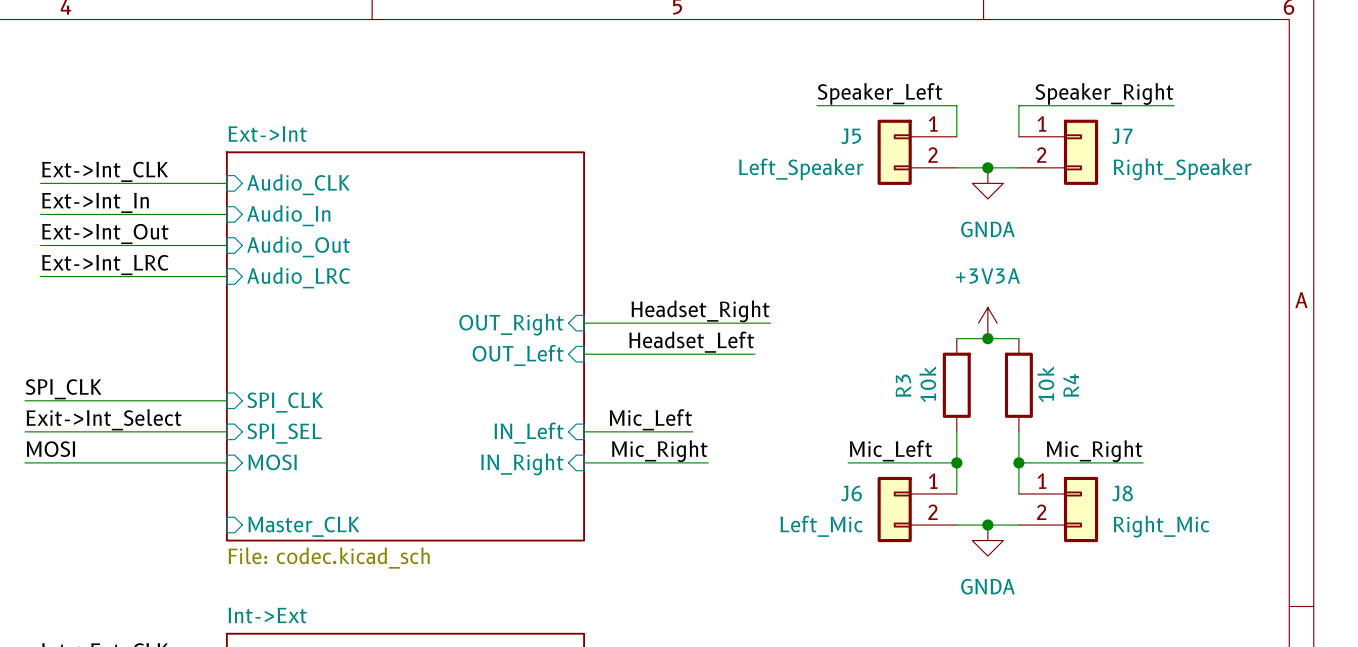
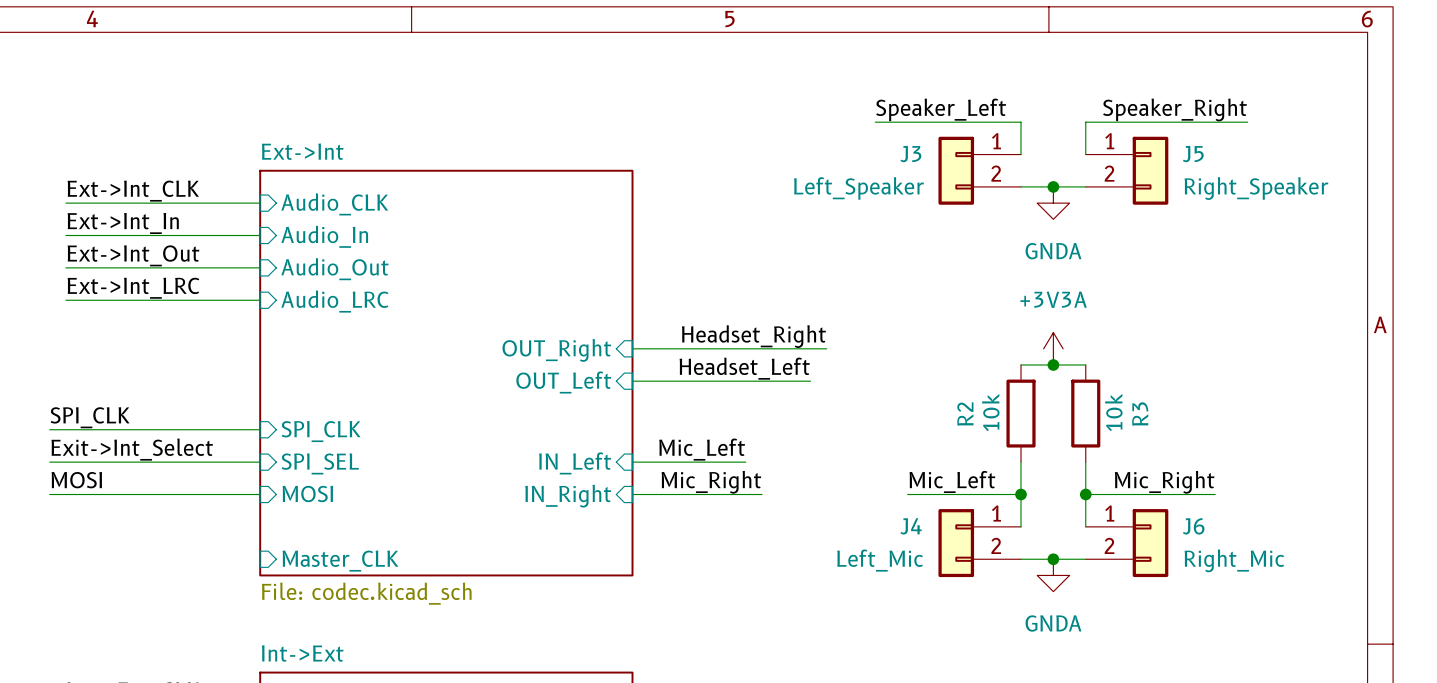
J5 name: J5 (851, 136) -> J3 (910, 154)
J7 name: J7 (1122, 136) -> J5 (1193, 154)
R3 name: R3 (903, 385) -> R2 (965, 414)
R4 name: R4 (1071, 385) -> R3 (1140, 414)
J6 name: J6 (851, 493) -> J4 (911, 526)
J8 name: J8 (1122, 493) -> J6 (1193, 526)

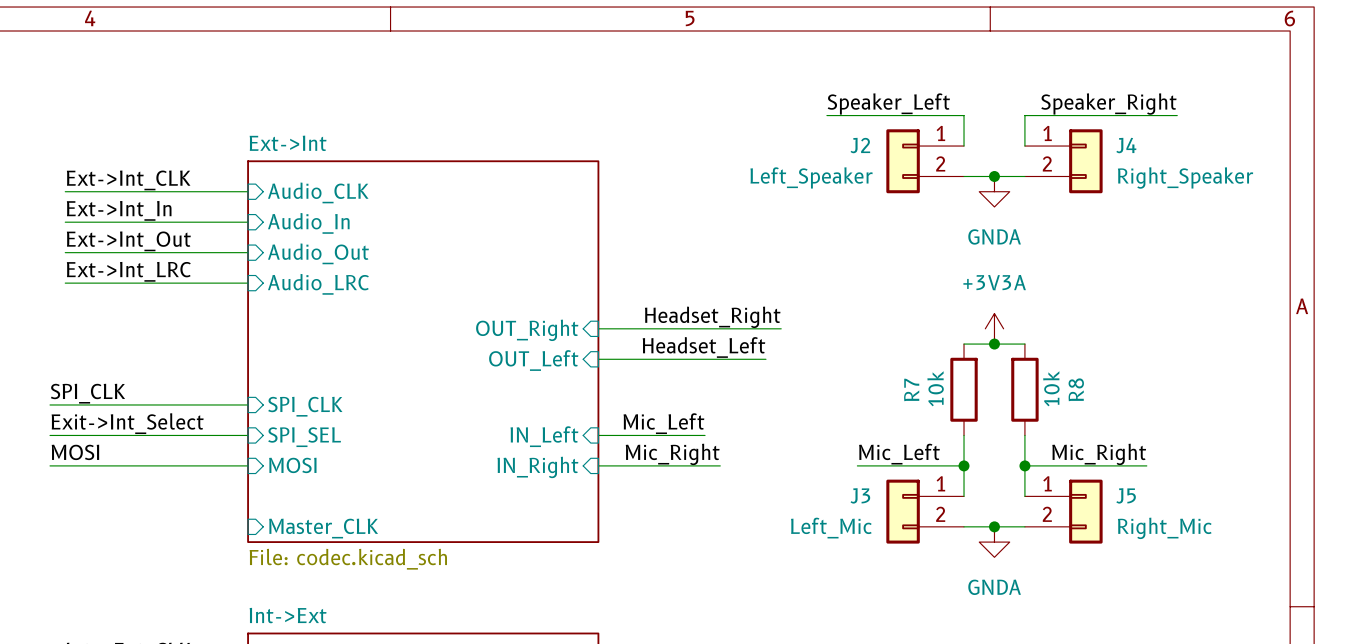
J3 name: J3 (910, 154) -> J2 (860, 145)
J5 name: J5 (1193, 154) -> J4 (1126, 145)
R2 name: R2 (965, 414) -> R7 (911, 389)
R3 name: R3 (1140, 414) -> R8 (1076, 389)
J4 name: J4 (911, 526) -> J3 (860, 495)
J6 name: J6 (1193, 526) -> J5 (1126, 495)

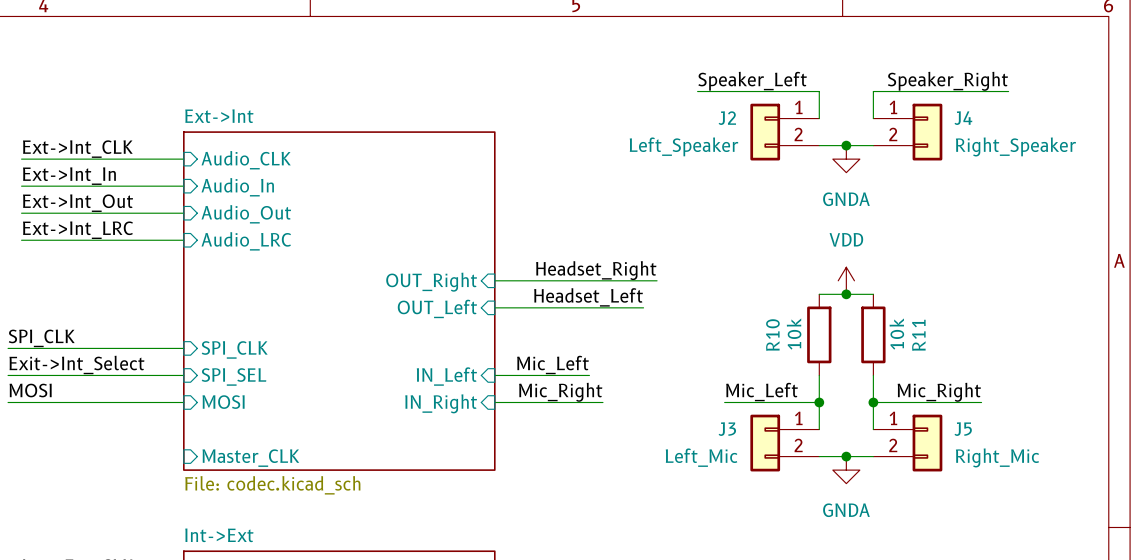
power symbol: +3V3A (994, 328) -> VDD (846, 280)
R7 name: R7 (911, 389) -> R10 (772, 335)
R8 name: R8 (1076, 389) -> R11 (918, 335)

